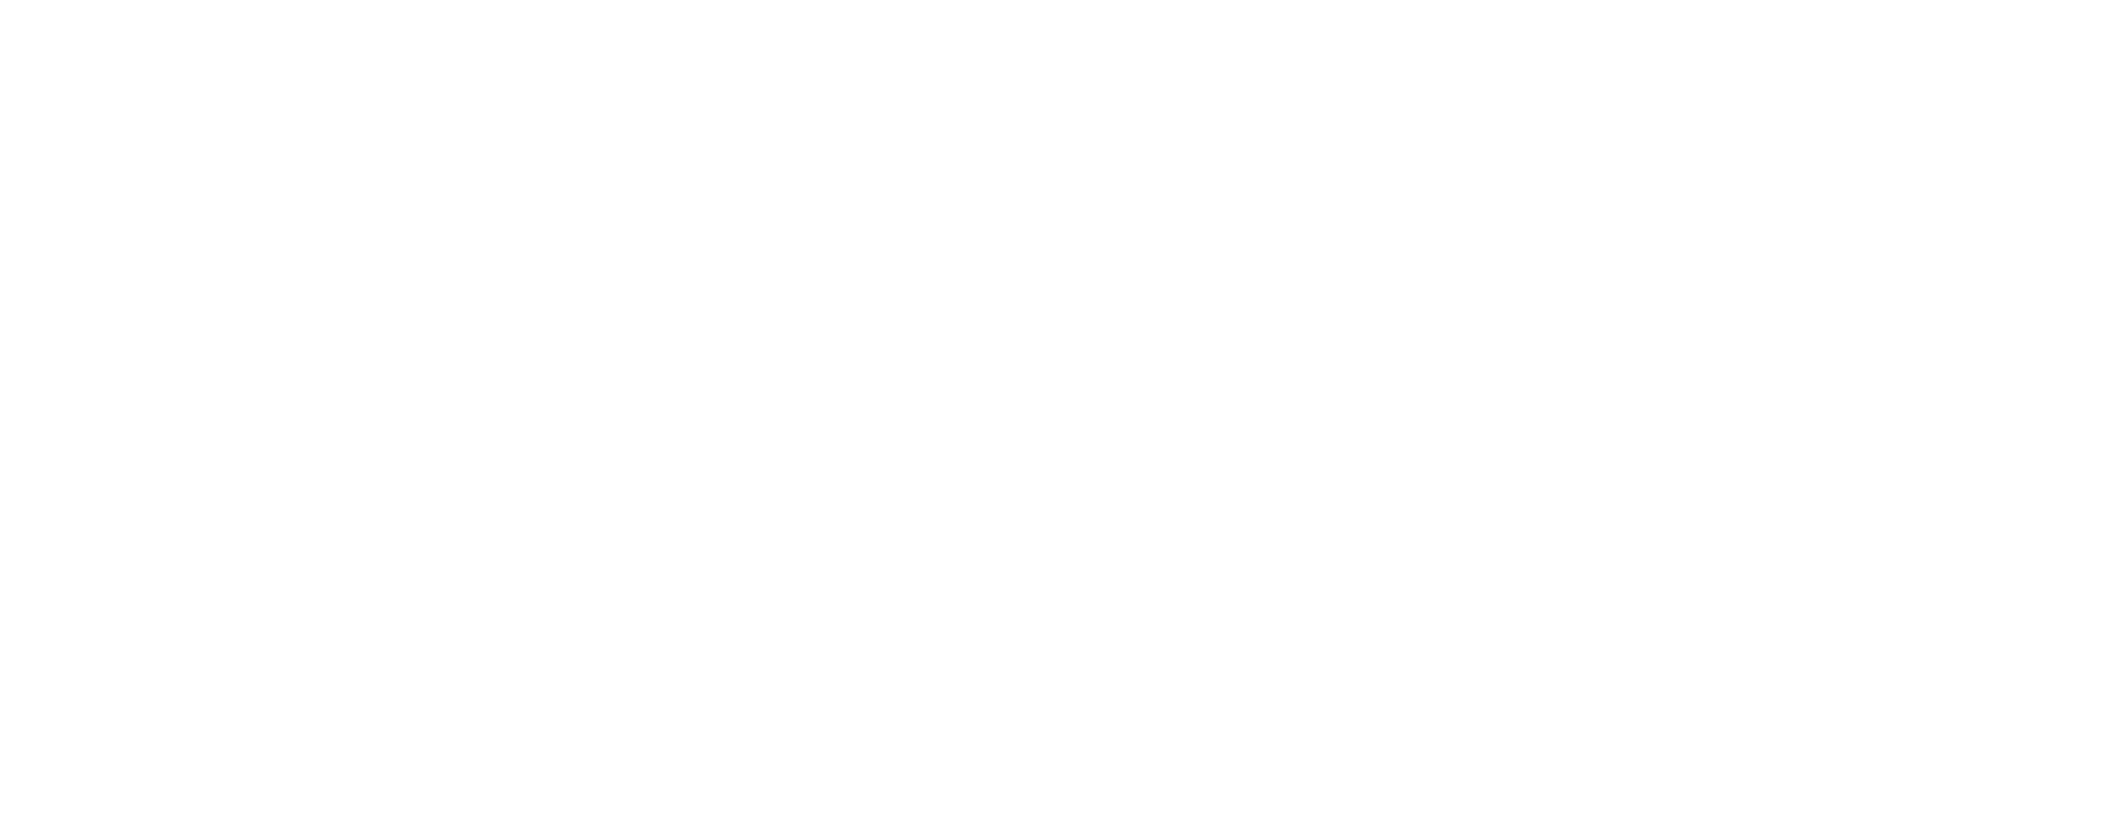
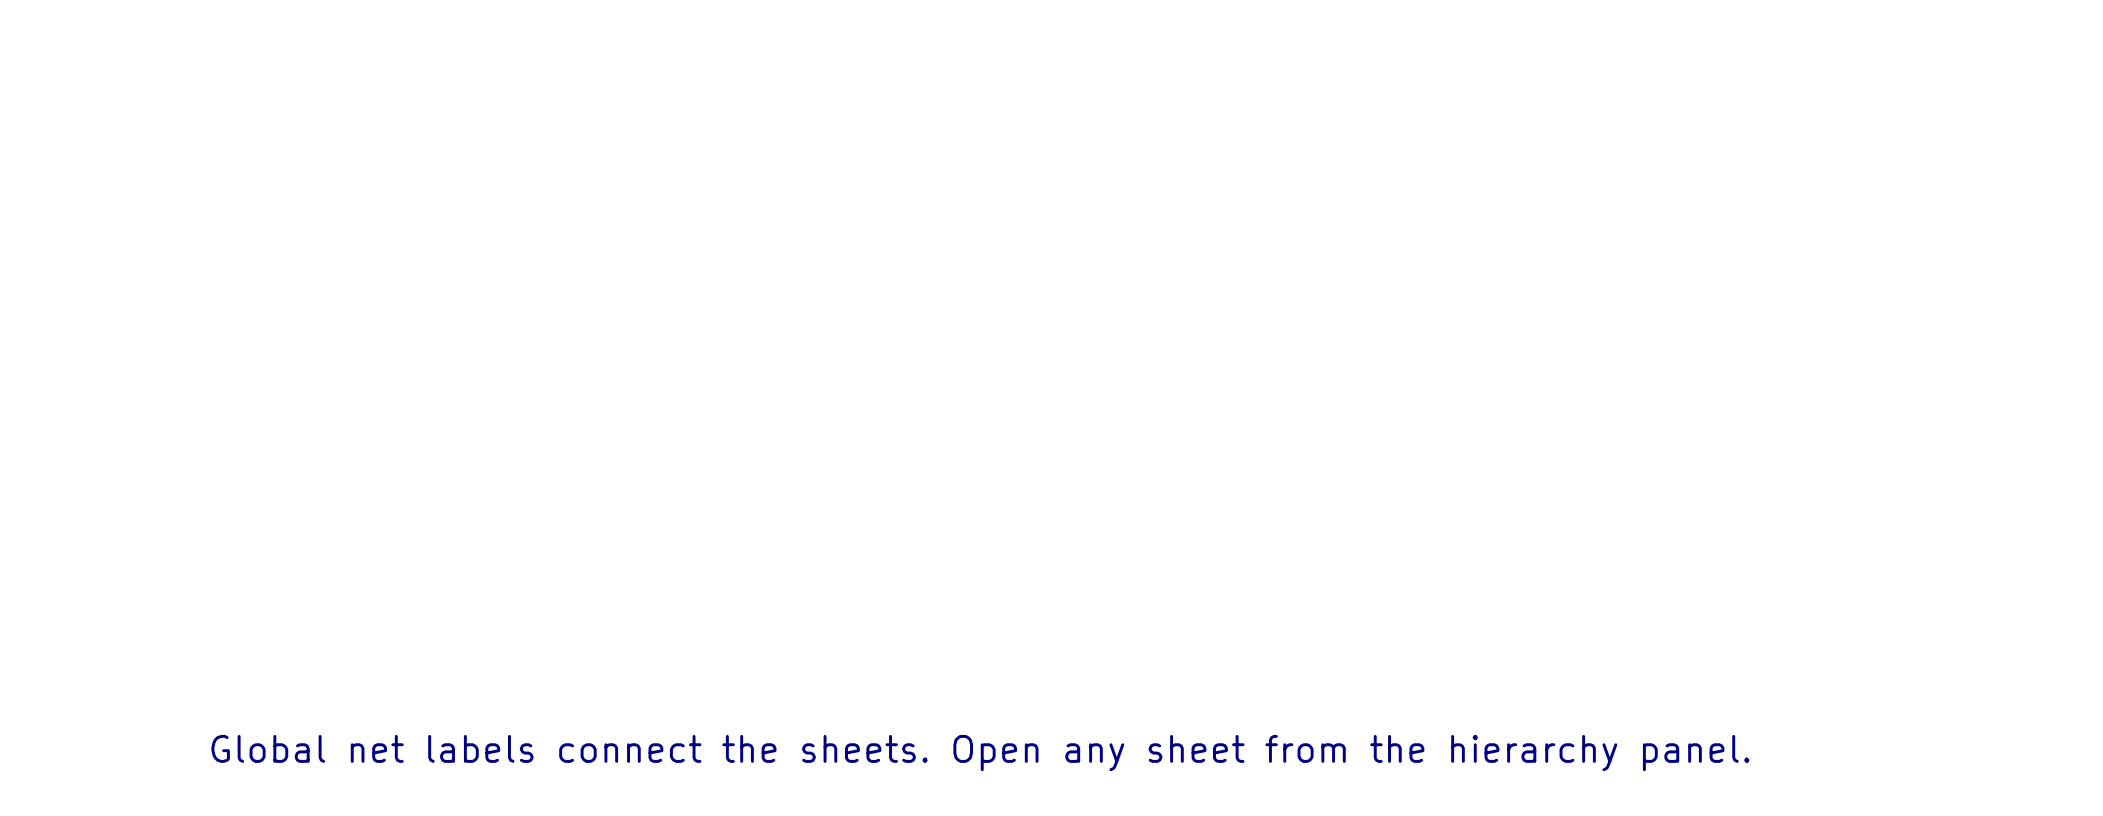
text: none -> Global net labels connect the sheets. Open any sheet from the hierarchy panel. (980, 753)

